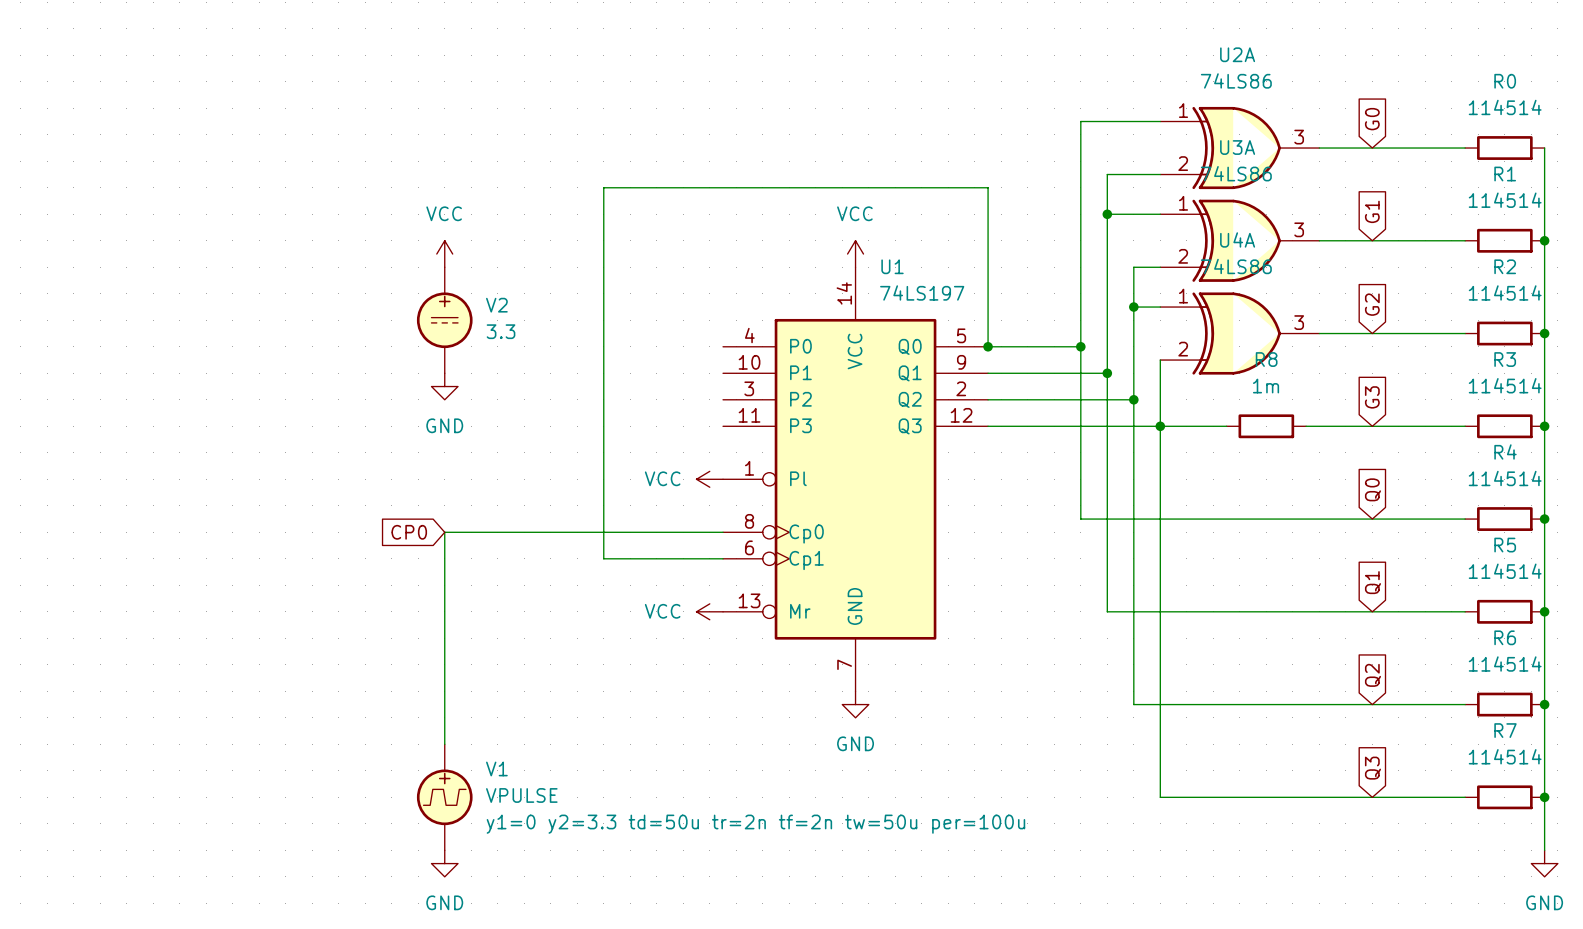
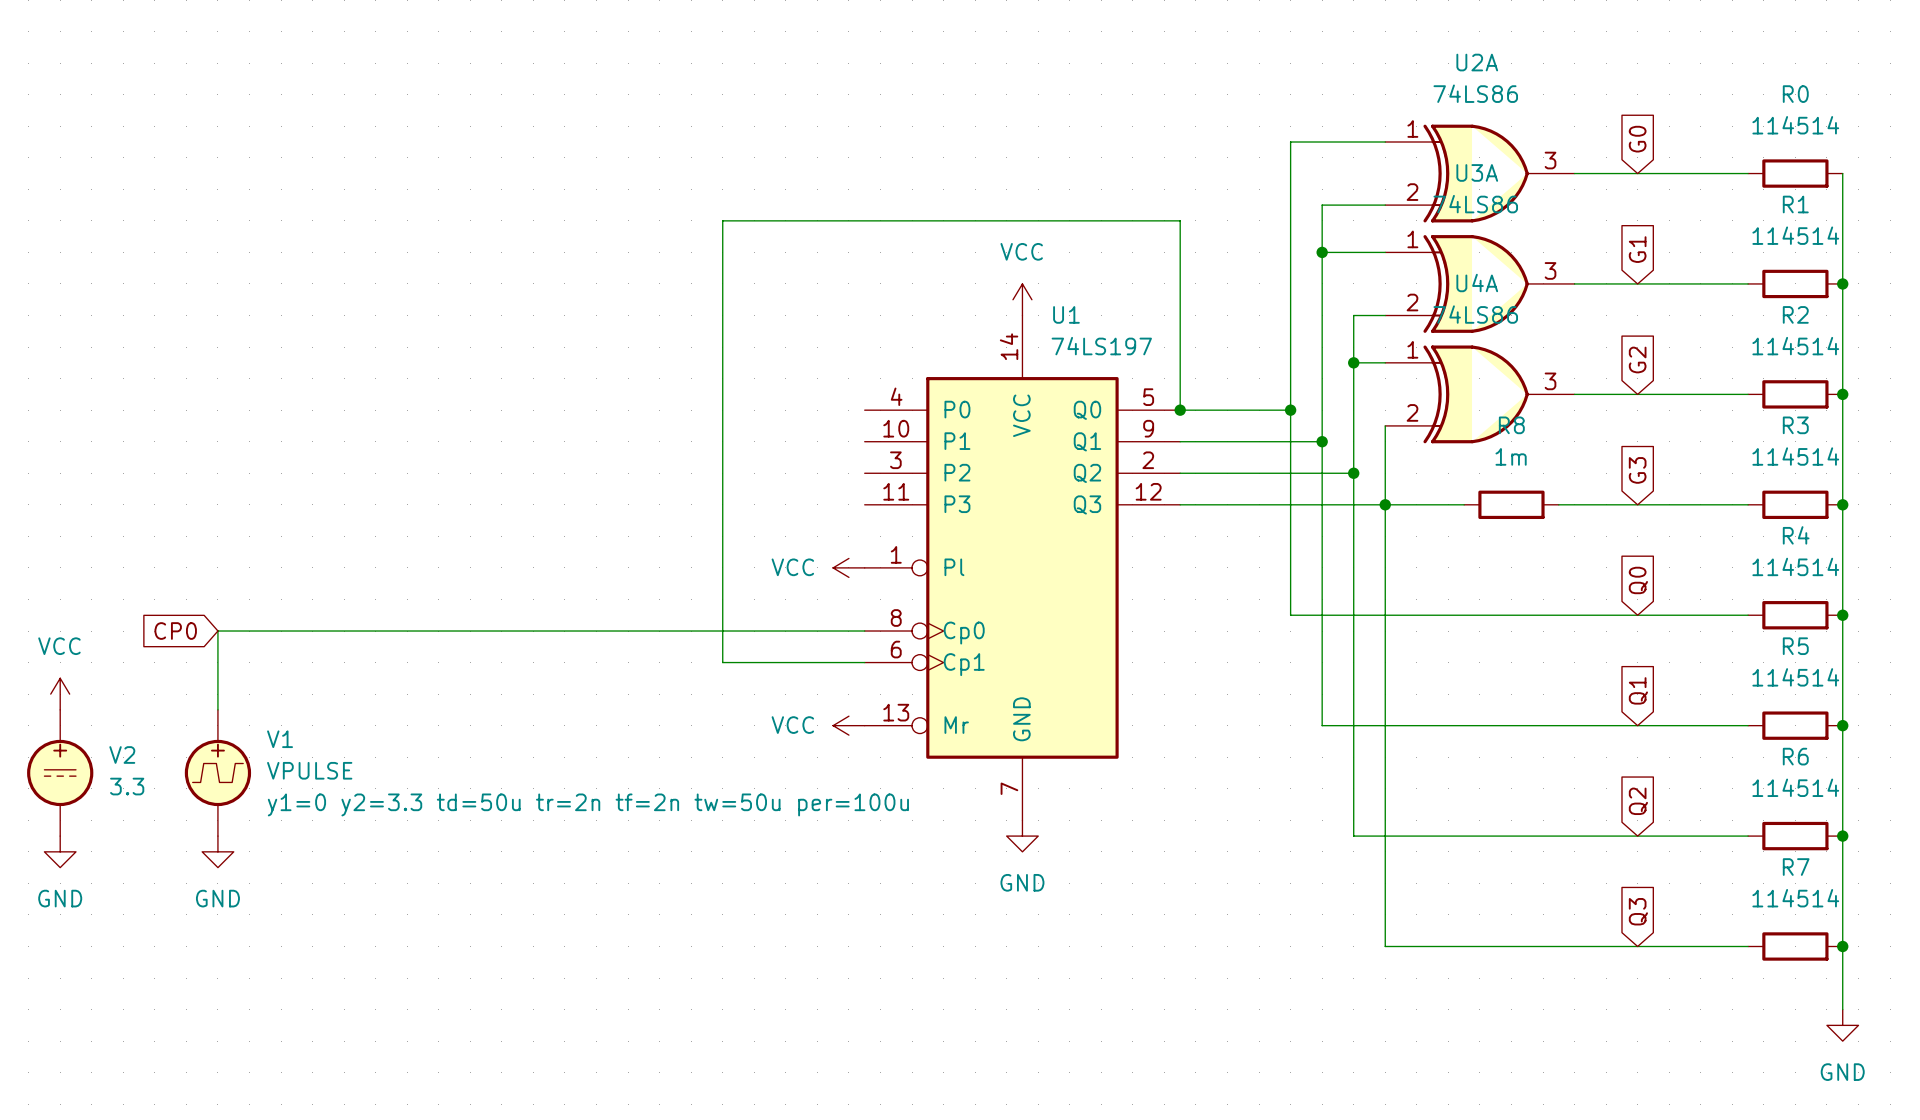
power symbol: VCC (444, 254) -> none
V2 position: (444, 320) -> (60, 772)
power symbol: GND (444, 386) -> none
global label: none -> CP0 (175, 631)
global label: CP0 (409, 532) -> none
wire: (444, 532) (444, 744) -> (533, 631) (217, 631) (217, 709)
power symbol: none -> VCC (60, 694)
power symbol: none -> GND (60, 851)
power symbol: none -> GND (217, 851)
V1 position: (444, 797) -> (217, 772)
power symbol: GND (444, 863) -> none

